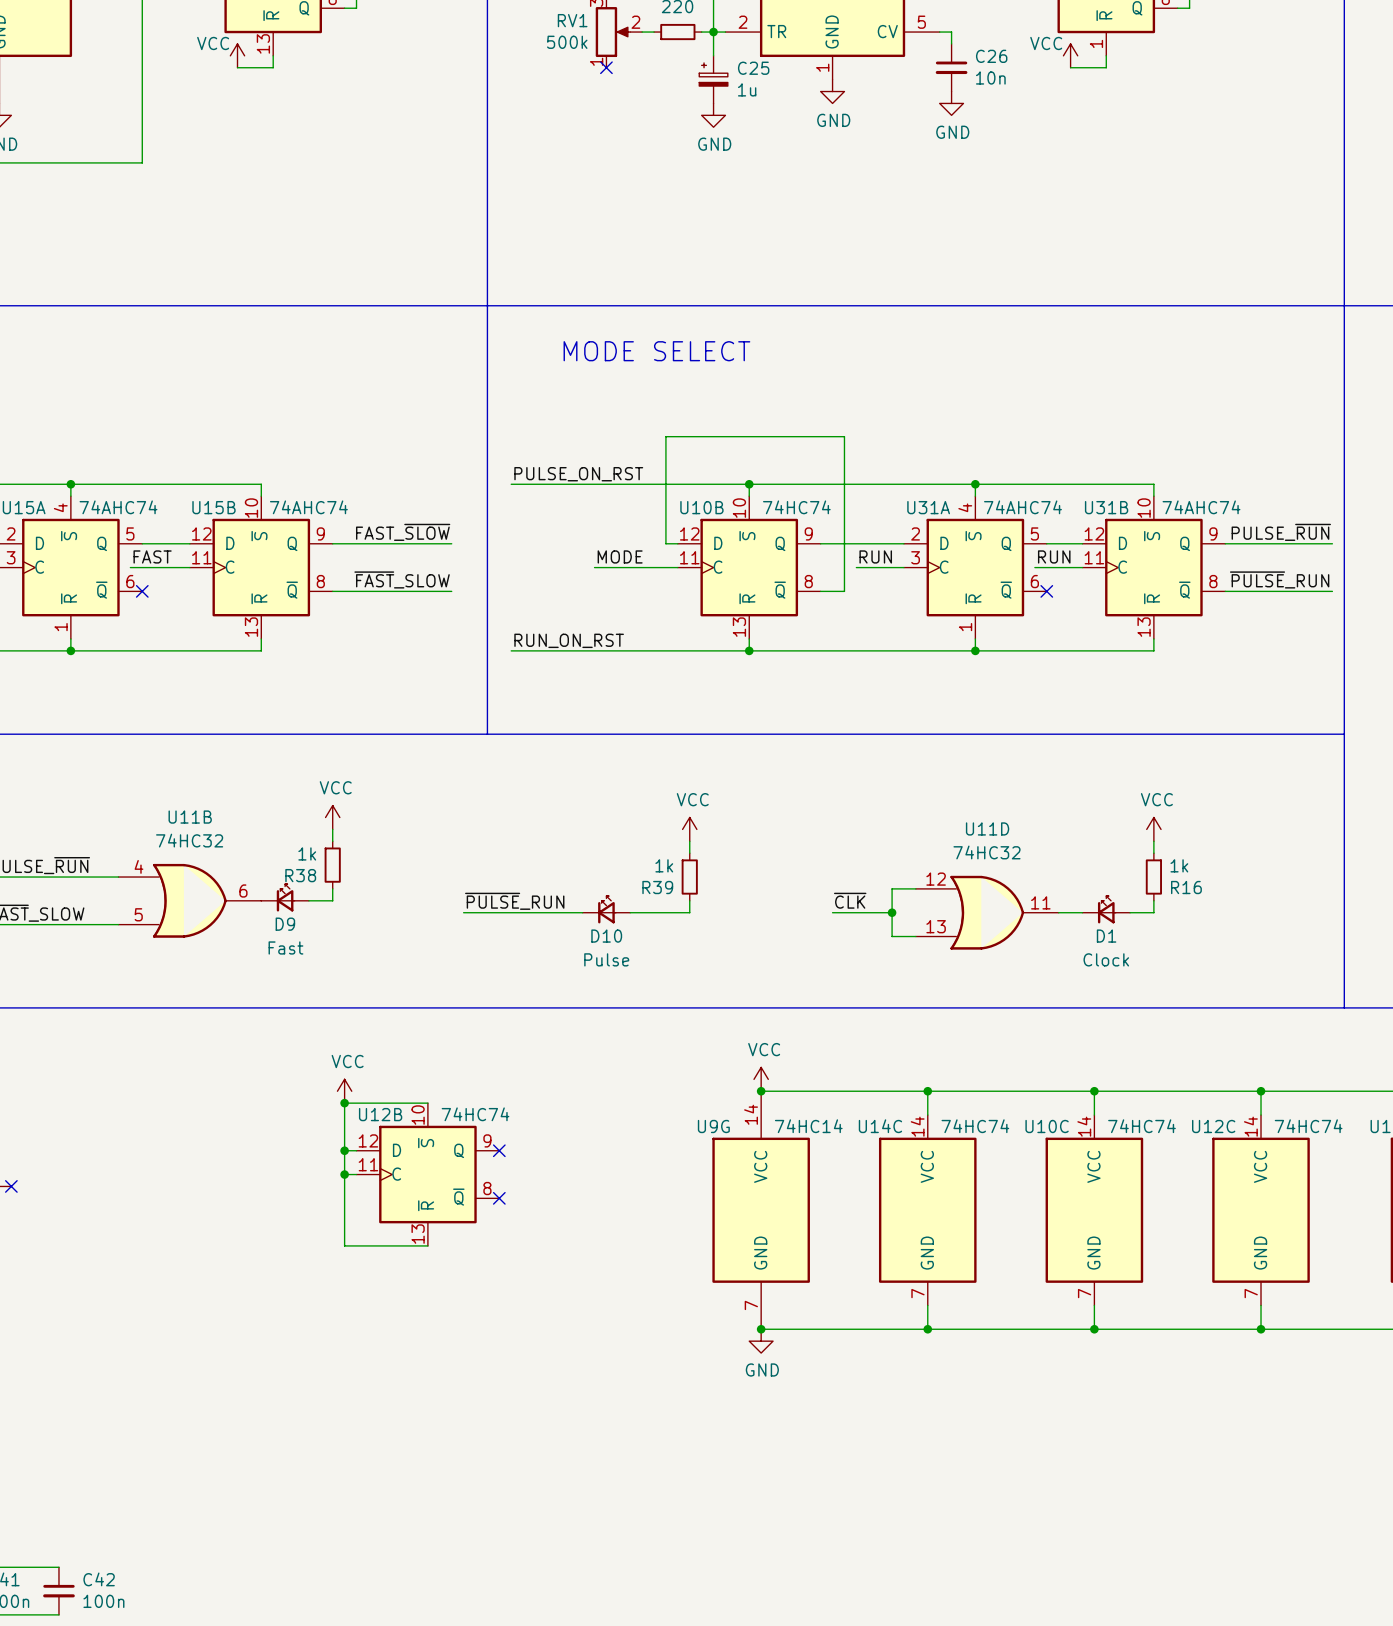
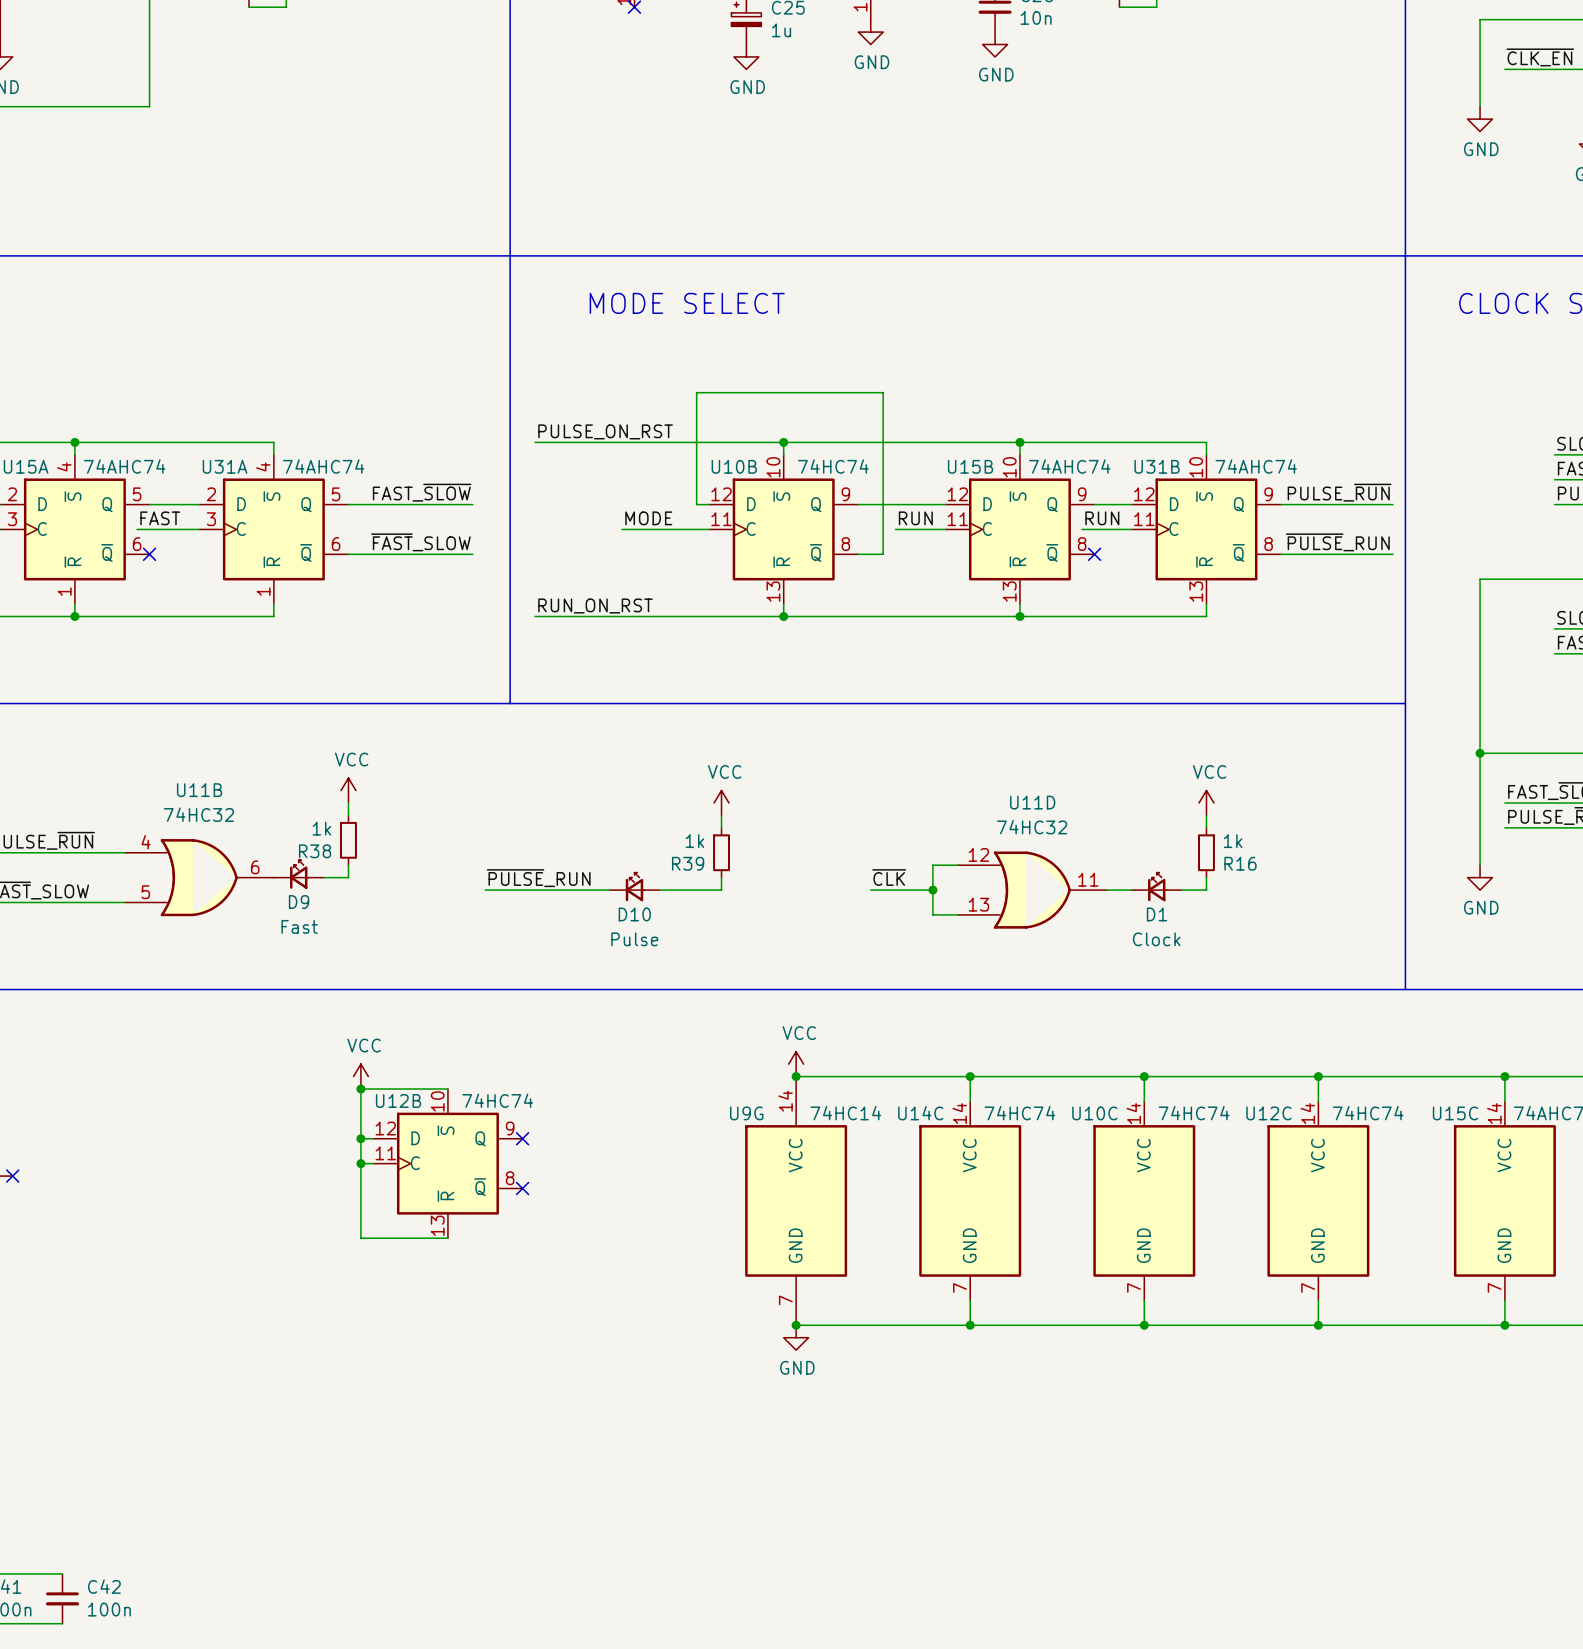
U15B position: (261, 567) -> (1019, 529)
U31A position: (975, 567) -> (273, 529)

